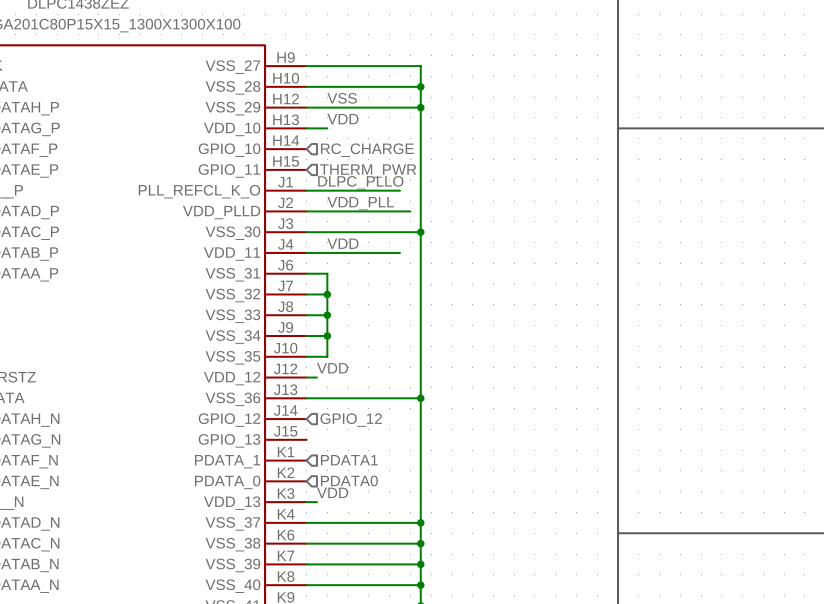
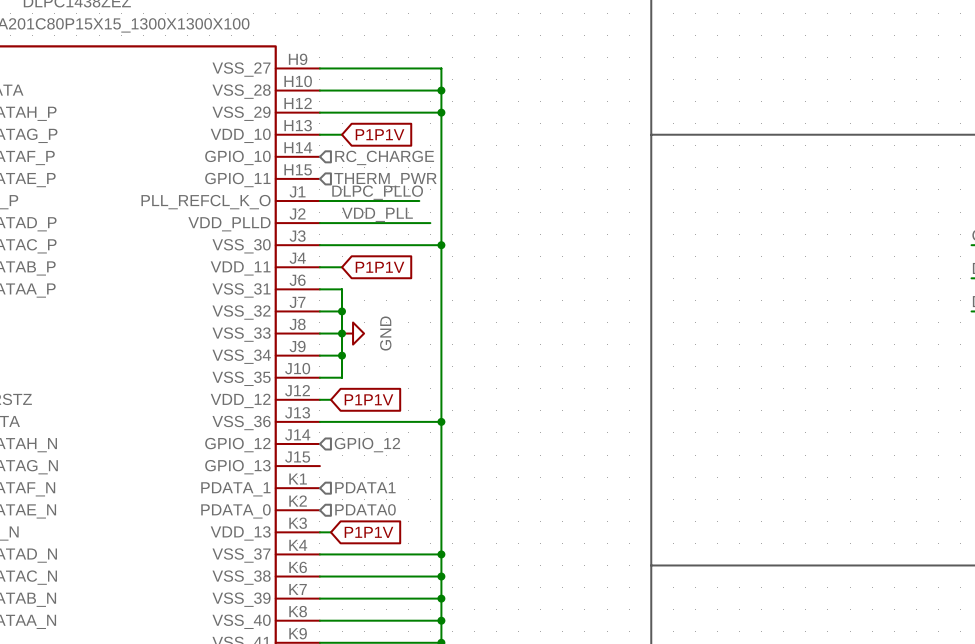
label: VSS (342, 98) -> none
label: VDD (342, 119) -> none
global label: none -> P1P1V (380, 134)
label: VDD (342, 243) -> none
wire: (327, 252) (400, 252) -> none
global label: none -> P1P1V (380, 267)
power symbol: none -> GND (353, 333)
label: VDD (332, 368) -> none
global label: none -> P1P1V (369, 399)
label: VDD (332, 492) -> none
global label: none -> P1P1V (369, 532)

